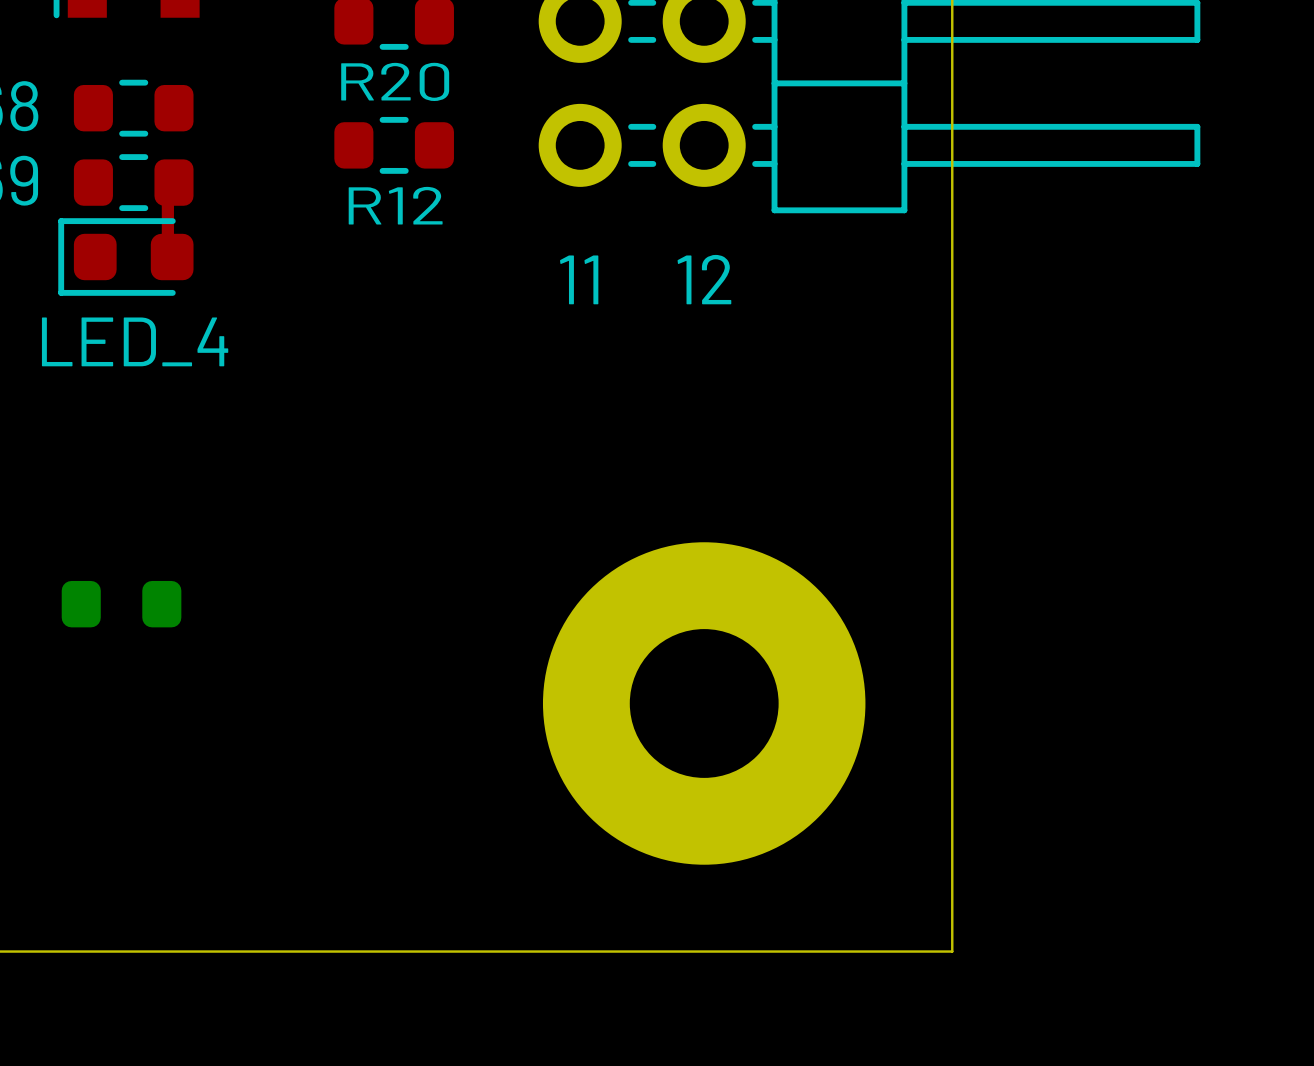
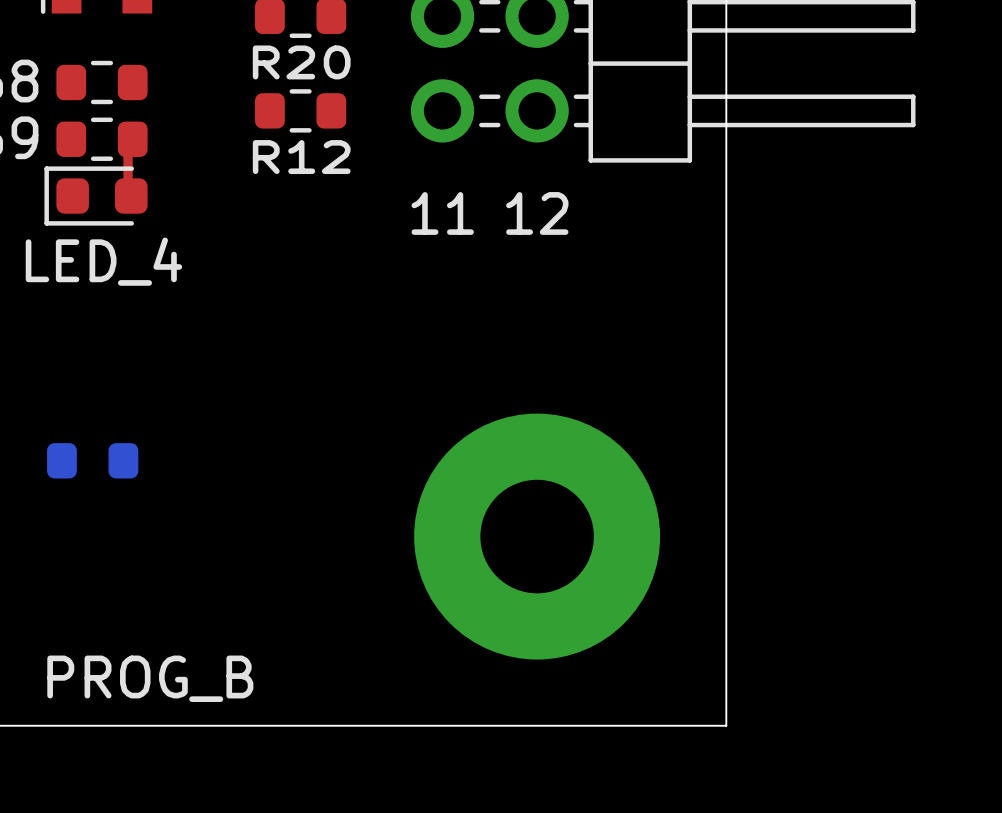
text: none -> PROG_B (150, 678)

